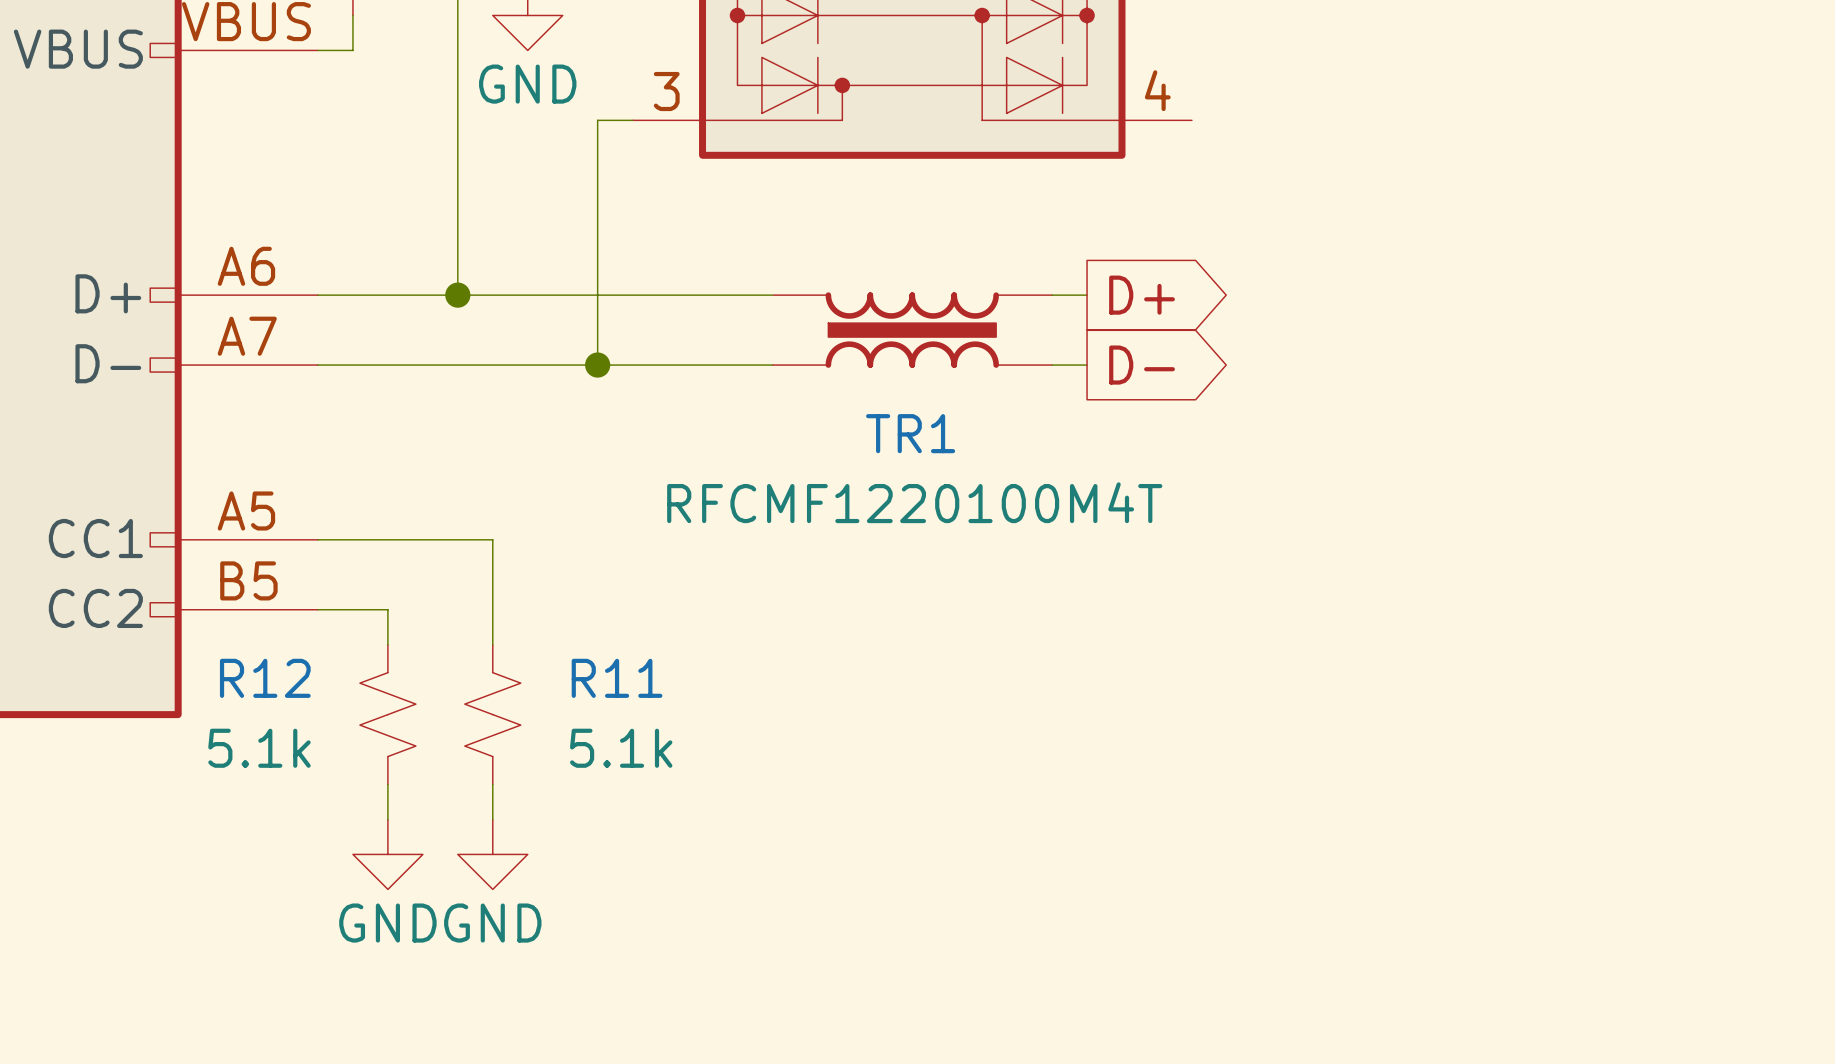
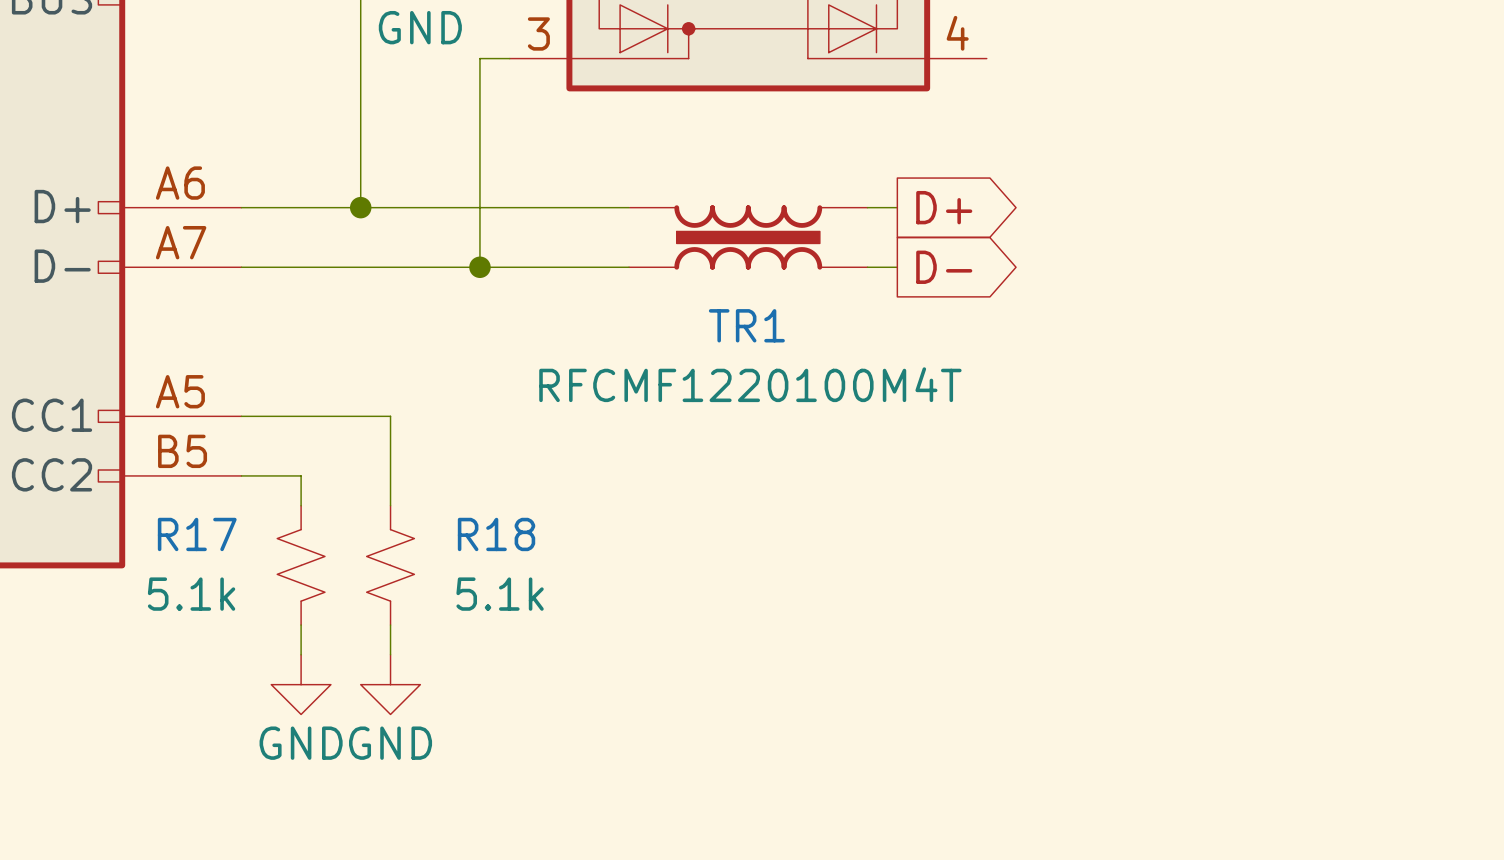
R12 name: R12 (265, 678) -> R17 (197, 534)
R11 name: R11 (617, 678) -> R18 (496, 534)

